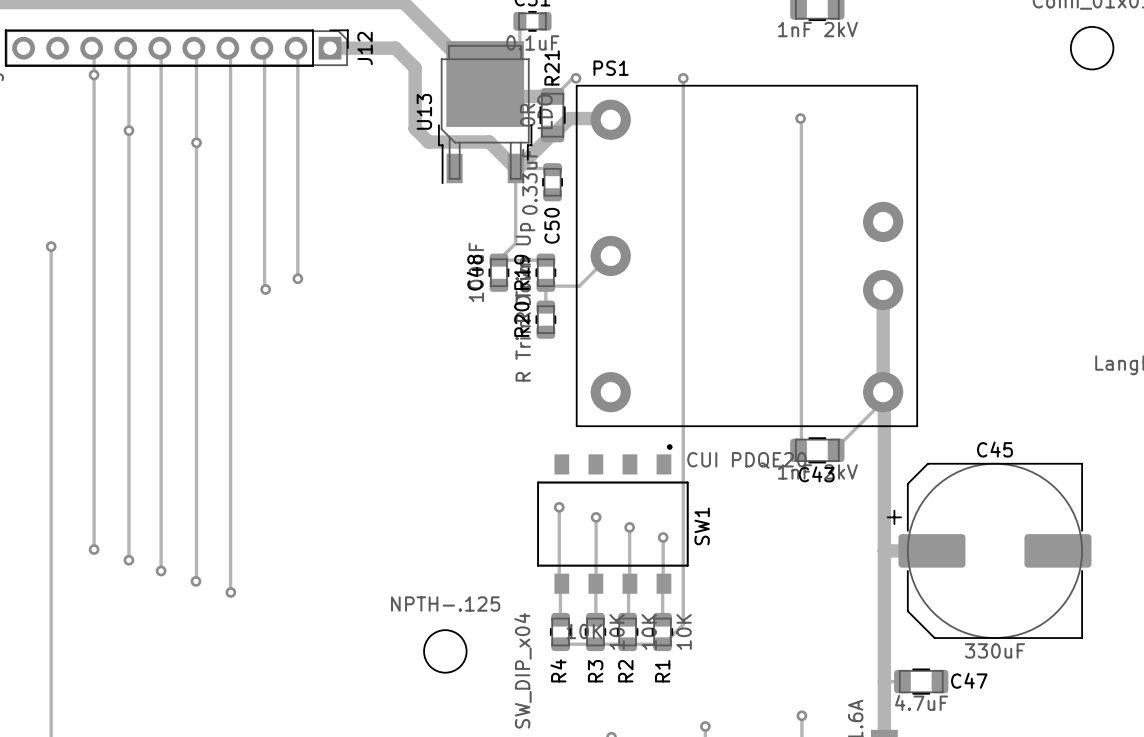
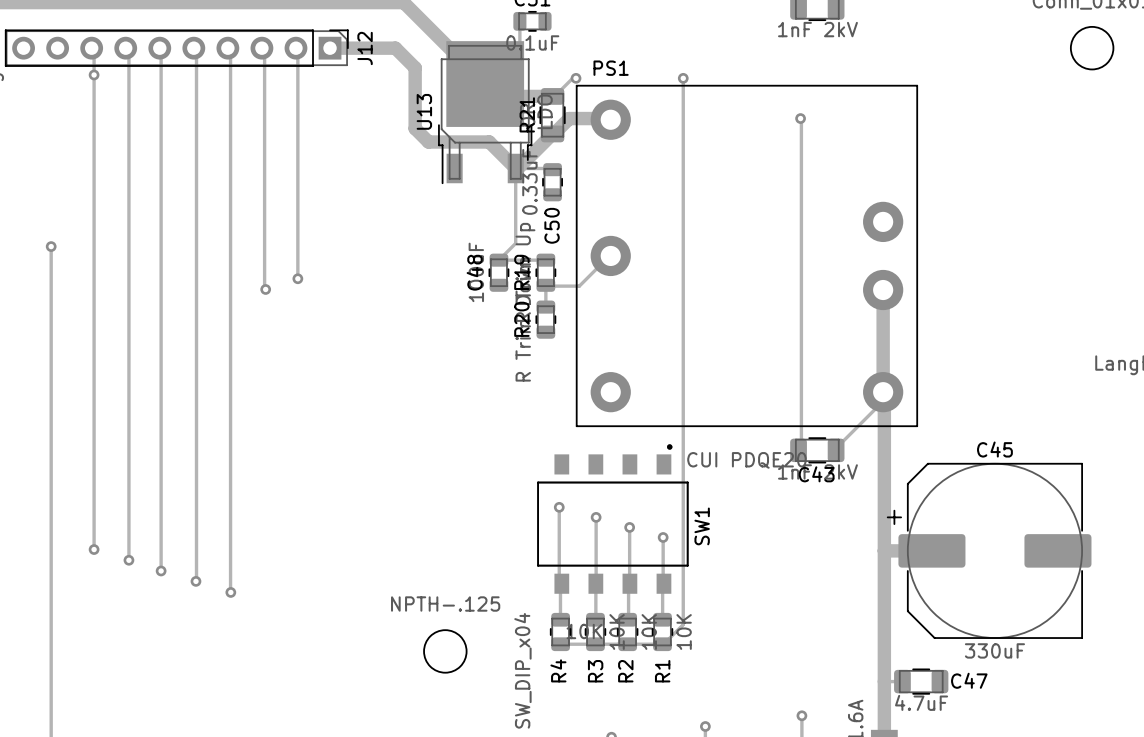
R21 name position: R21 (552, 67) -> R21 (527, 114)
via: (128, 130) -> none
via: (196, 142) -> none

